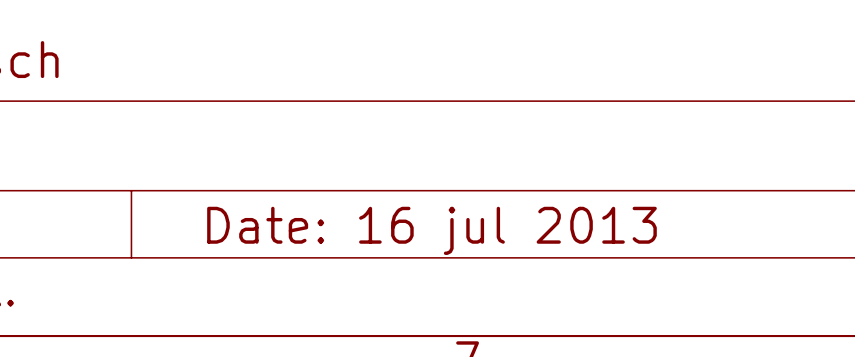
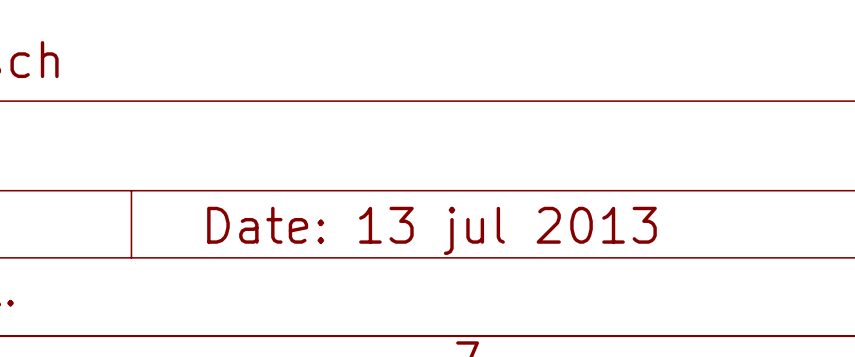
title block: Date: 16 jul 2013 (431, 230) -> Date: 13 jul 2013 (431, 230)

